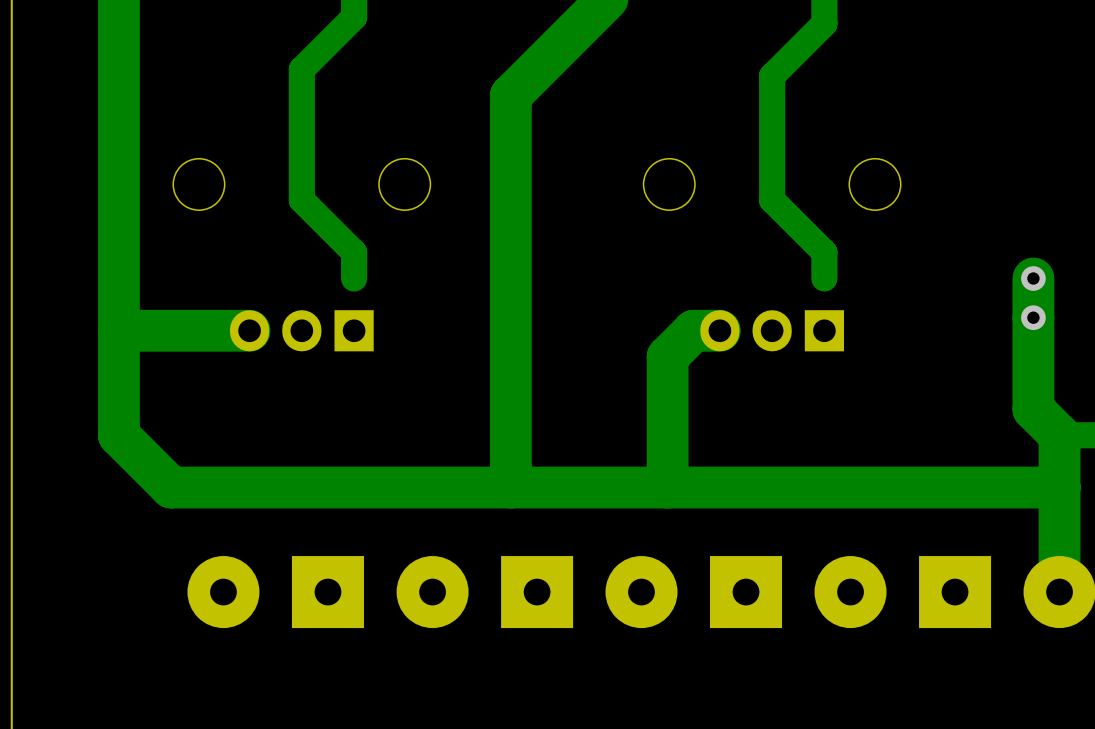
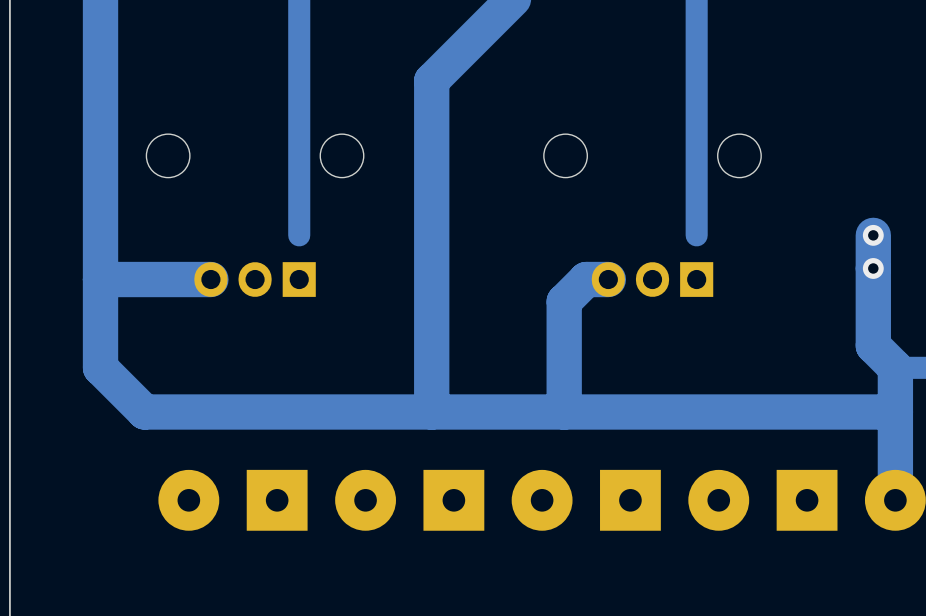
track: (354, 17) (301, 69) (301, 200) (354, 252) -> (299, 14) (299, 213)
track: (824, 23) (772, 76) (772, 200) (824, 252) -> (696, 20) (696, 213)

